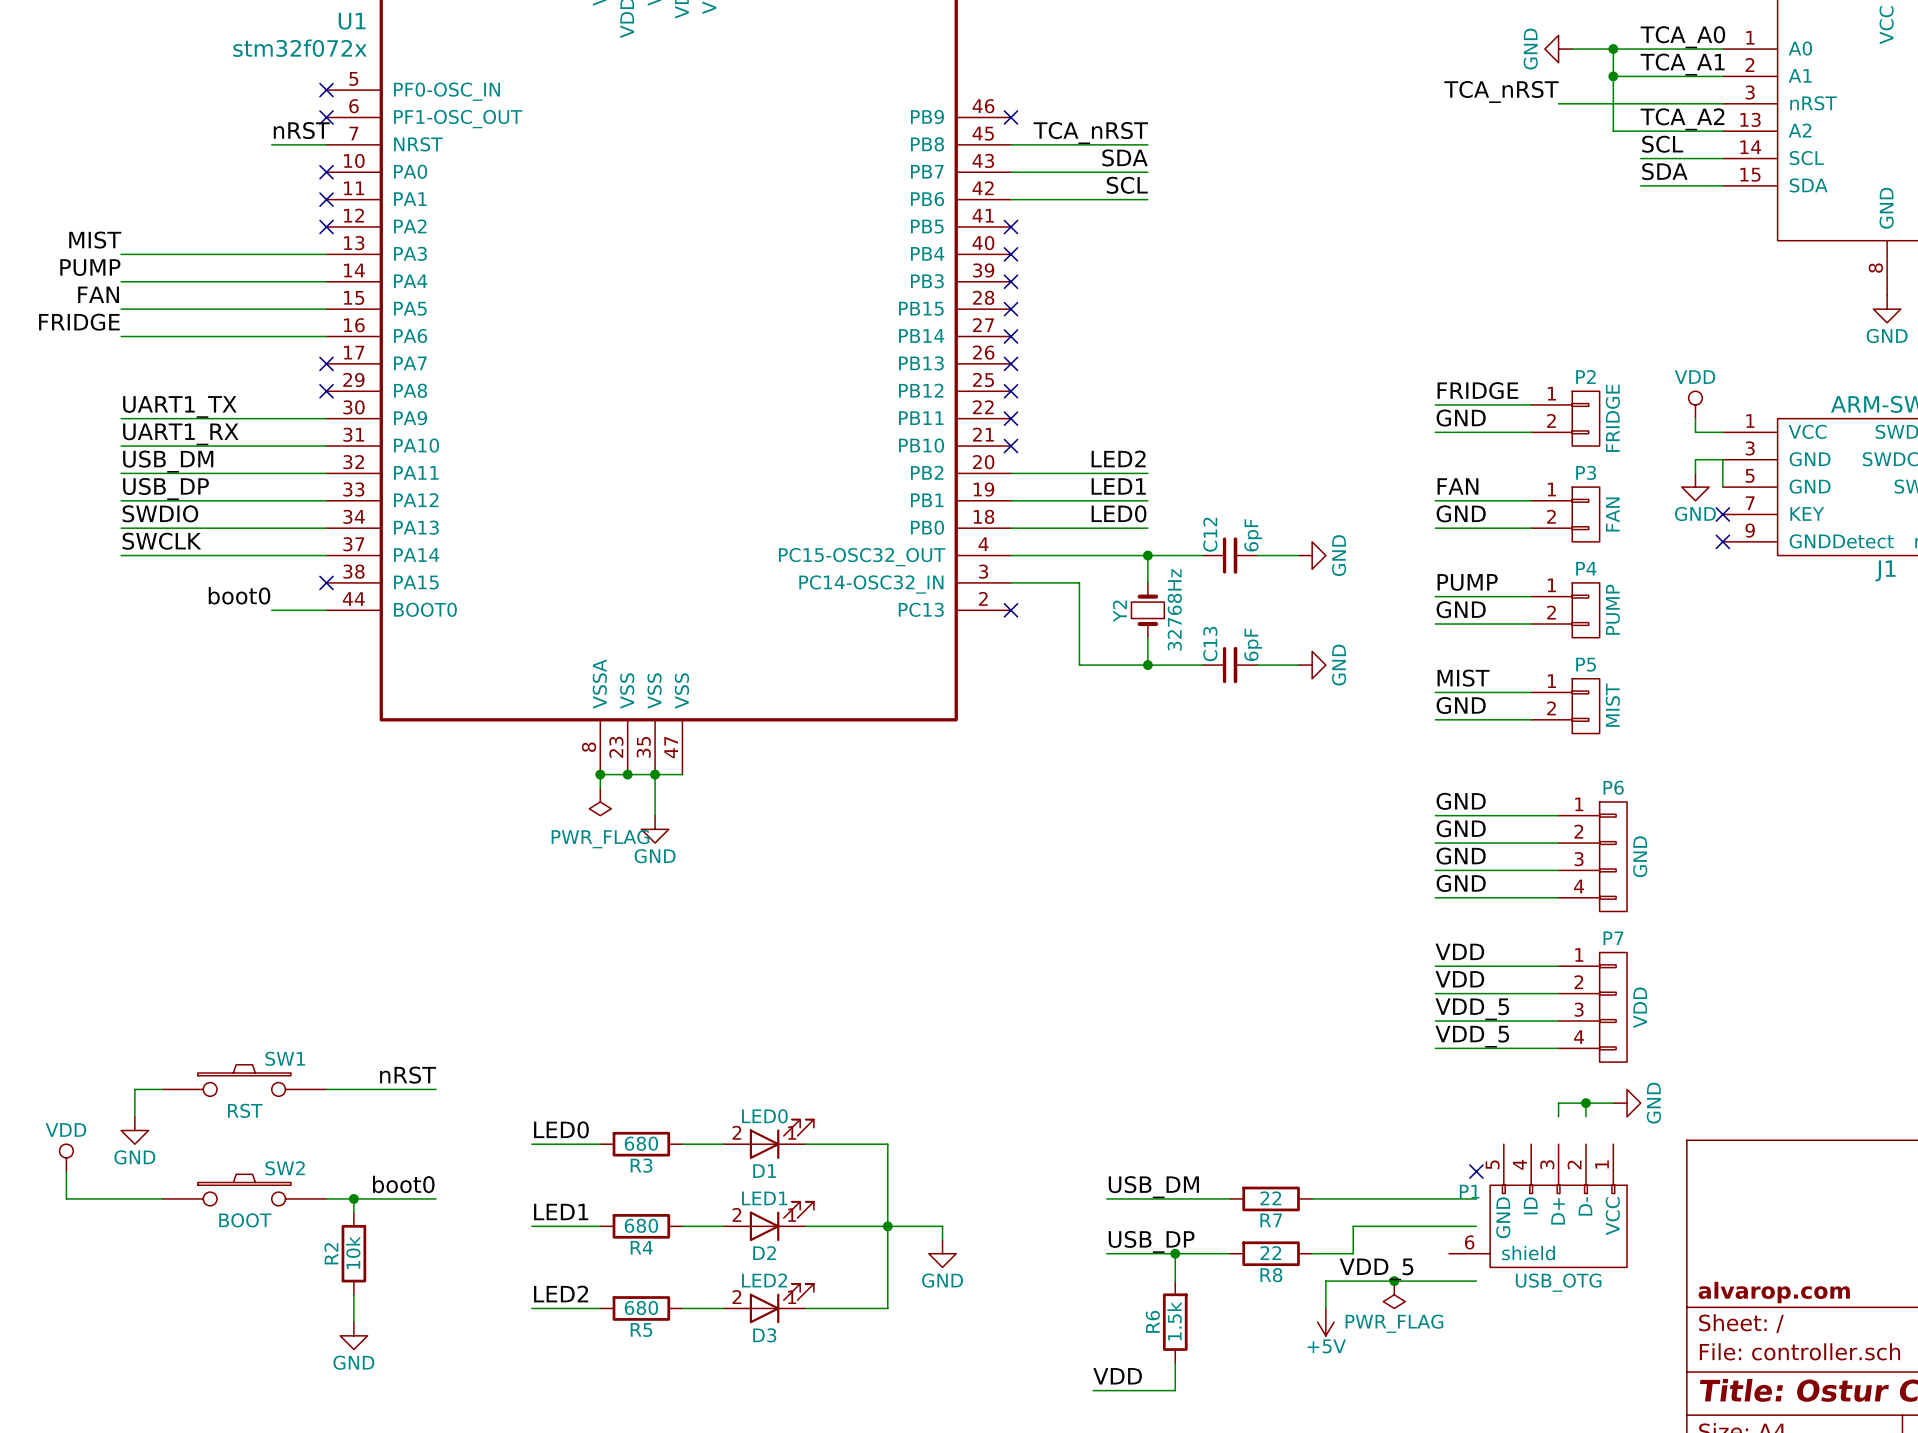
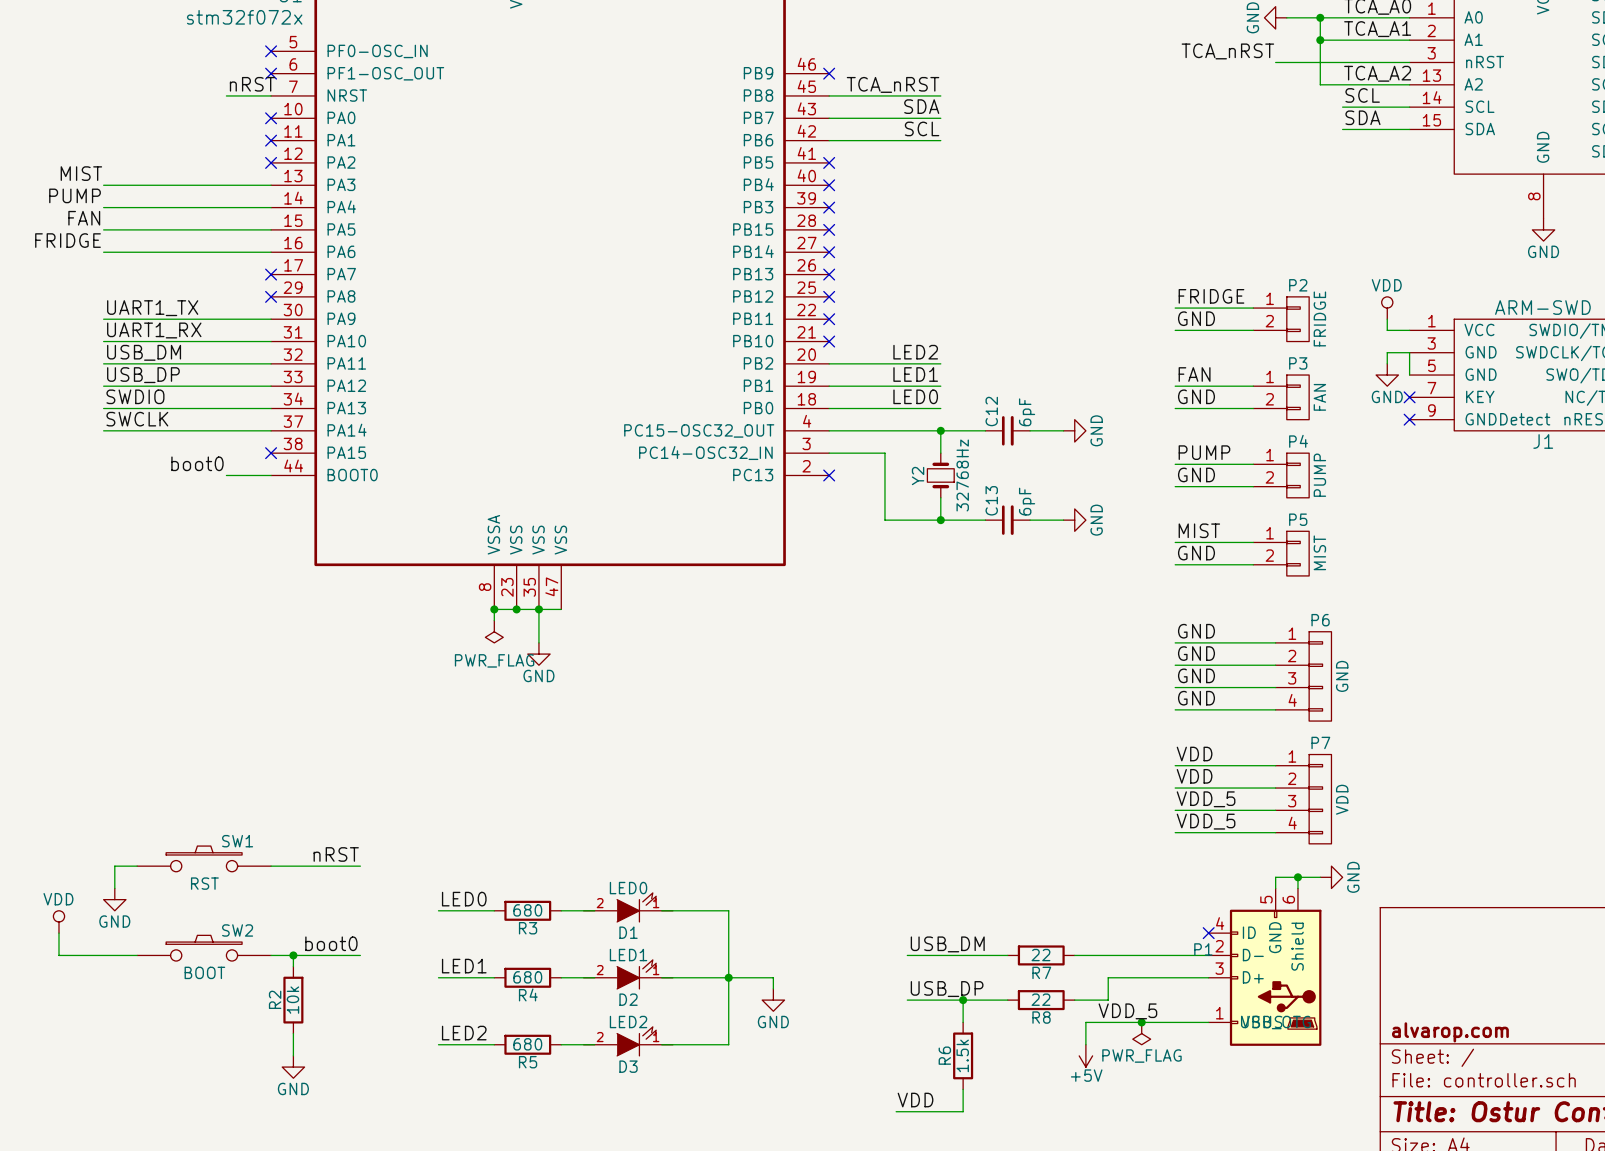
D1 symbol: [723, 1119, 814, 1159] -> [583, 892, 673, 922]
P1 symbol: [1449, 1144, 1628, 1268] -> [1208, 888, 1322, 1046]
D2 symbol: [723, 1201, 814, 1242] -> [583, 959, 673, 989]
D3 symbol: [723, 1283, 814, 1324] -> [583, 1026, 673, 1056]

